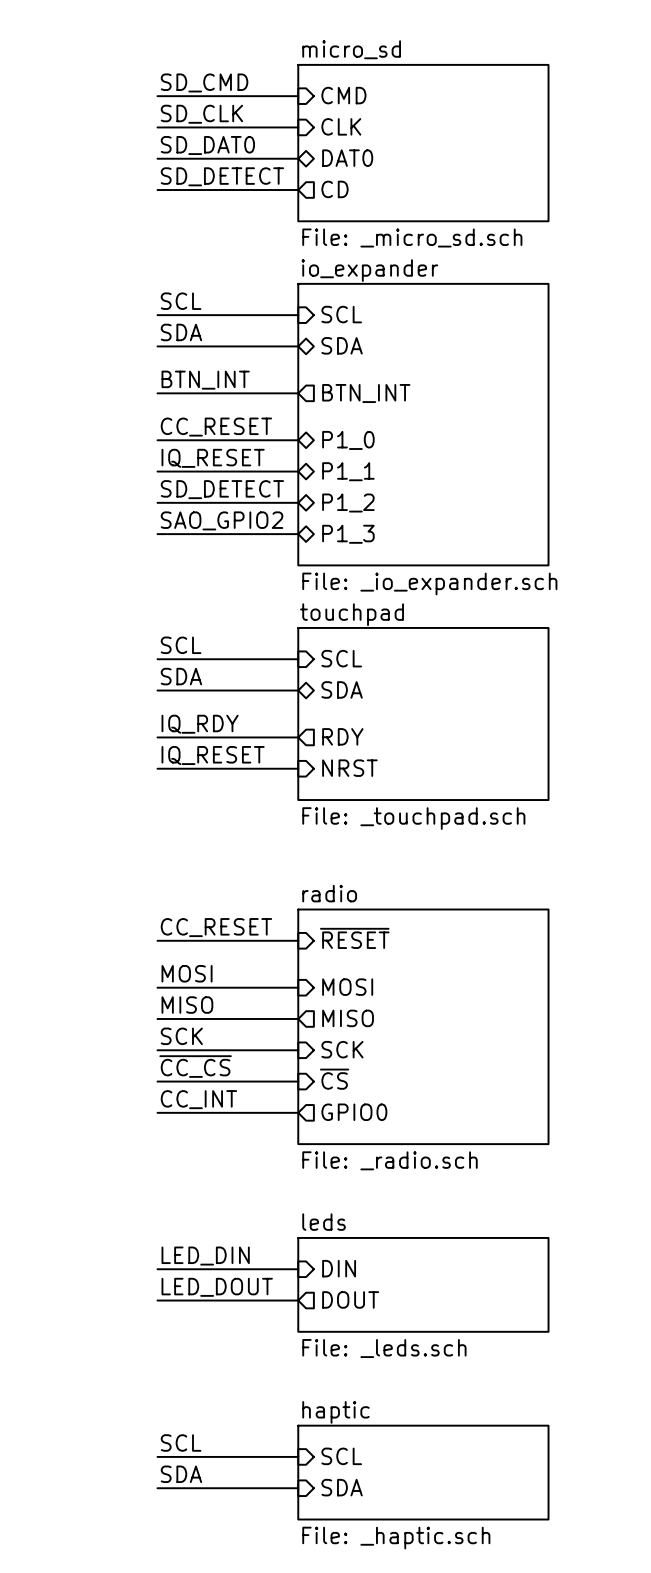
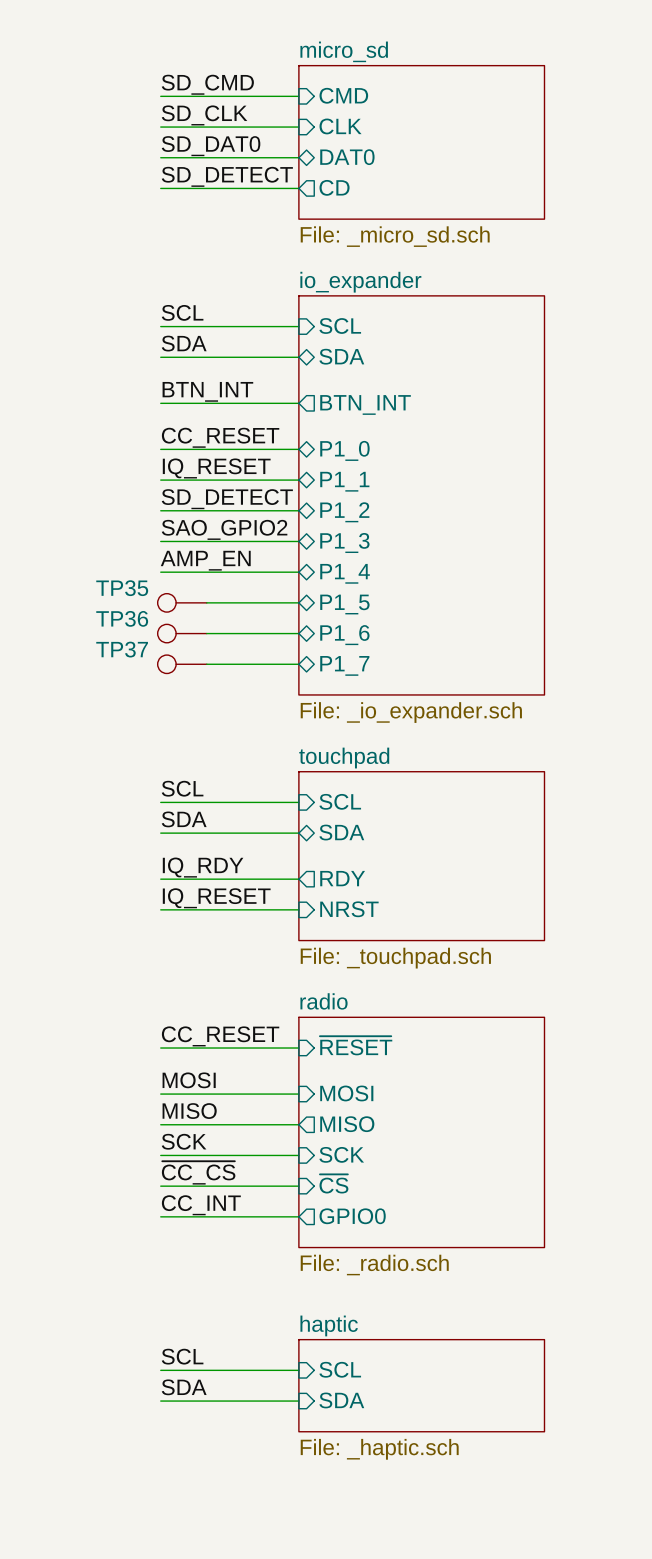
label position: SCL (181, 301) -> SCL (182, 312)
sheet pin position: SCL (341, 314) -> SCL (340, 326)
wire: (157, 315) (298, 315) -> (160, 326) (298, 326)
label position: SDA (181, 332) -> SDA (184, 343)
sheet pin position: SDA (342, 345) -> SDA (341, 356)
wire: (157, 346) (298, 346) -> (160, 357) (298, 357)
label position: BTN_INT (205, 380) -> BTN_INT (207, 391)
wire: (157, 393) (298, 393) -> (160, 510) (298, 510)
sheet pin position: BTN_INT (366, 393) -> BTN_INT (365, 404)
sheet io_expander: File: _io_expander.sch (423, 424) -> none
label position: CC_RESET (216, 427) -> CC_RESET (220, 437)
wire: (157, 440) (298, 440) -> (160, 449) (298, 449)
sheet pin position: P1_0 (348, 440) -> P1_0 (344, 450)
label position: IQ_RESET (213, 458) -> IQ_RESET (216, 468)
wire: (157, 471) (298, 471) -> (160, 480) (298, 480)
sheet pin position: P1_1 (348, 471) -> P1_1 (344, 481)
label position: SD_DETECT (222, 489) -> SD_DETECT (227, 499)
wire: (157, 502) (298, 502) -> (160, 403) (298, 403)
sheet pin position: P1_2 (348, 502) -> P1_2 (344, 512)
sheet io_expander: none -> File: _io_expander.sch (421, 495)
label position: SAO_GPIO2 (222, 520) -> SAO_GPIO2 (224, 529)
wire: (157, 534) (298, 534) -> (160, 541) (298, 541)
sheet pin position: P1_3 (348, 534) -> P1_3 (344, 543)
label: none -> AMP_EN (205, 560)
sheet pin: none -> P1_4 (345, 573)
TP35: none -> (182, 602)
wire: none -> (206, 602) (298, 602)
sheet pin: none -> P1_5 (344, 604)
TP36: none -> (182, 633)
wire: none -> (206, 633) (298, 633)
sheet pin: none -> P1_6 (344, 635)
label position: SCL (181, 645) -> SCL (182, 788)
sheet pin position: SCL (341, 658) -> SCL (340, 801)
wire: (157, 659) (298, 659) -> (160, 833) (298, 833)
TP37: none -> (182, 664)
wire: none -> (206, 664) (298, 664)
sheet pin: none -> P1_7 (344, 665)
label position: SDA (181, 676) -> SDA (184, 819)
sheet pin position: SDA (342, 689) -> SDA (341, 832)
wire: (157, 690) (298, 690) -> (160, 802) (298, 802)
sheet touchpad position: (423, 713) -> (421, 856)
label position: IQ_RDY (200, 724) -> IQ_RDY (203, 867)
sheet pin position: RDY (342, 736) -> RDY (342, 878)
wire: (157, 737) (298, 737) -> (160, 572) (298, 572)
label: IQ_RESET (213, 755) -> none
wire: (157, 768) (298, 768) -> (160, 879) (298, 879)
sheet pin position: NRST (349, 768) -> NRST (349, 909)
label: none -> IQ_RESET (216, 898)
label position: CC_RESET (216, 927) -> CC_RESET (220, 1036)
sheet pin position: ~{RESET} (354, 938) -> ~{RESET} (356, 1045)
wire: (157, 940) (298, 940) -> (160, 1048) (298, 1048)
label: MOSI (187, 973) -> none
wire: (157, 987) (298, 987) -> (160, 909) (298, 909)
sheet pin: MOSI (347, 987) -> none
label position: MISO (187, 1005) -> MISO (189, 1111)
wire: (157, 1018) (298, 1018) -> (160, 1124) (298, 1124)
sheet pin position: MISO (348, 1018) -> MISO (347, 1124)
sheet radio position: (423, 1026) -> (421, 1132)
label position: SCK (181, 1036) -> SCK (184, 1141)
sheet pin position: SCK (342, 1049) -> SCK (341, 1154)
wire: (157, 1050) (298, 1050) -> (160, 1155) (298, 1155)
label position: ~{CC_CS} (195, 1066) -> ~{CC_CS} (198, 1172)
sheet pin position: ~{CS} (334, 1079) -> ~{CS} (333, 1183)
wire: (157, 1081) (298, 1081) -> (160, 1186) (298, 1186)
label: CC_INT (198, 1099) -> MOSI (189, 1080)
sheet pin shape: output (354, 1112) -> input (346, 1093)
sheet pin: GPIO0 (354, 1112) -> MOSI (346, 1093)
label: none -> CC_INT (201, 1205)
sheet pin: none -> GPIO0 (352, 1216)
label: LED_DIN (205, 1256) -> none
sheet pin: DIN (339, 1268) -> none
wire: (157, 1269) (298, 1269) -> (160, 1370) (298, 1370)
sheet leds: File: _leds.sch (423, 1284) -> none
label: LED_DOUT (217, 1287) -> none
sheet pin: DOUT (350, 1299) -> none
wire: (157, 1300) (298, 1300) -> (160, 1401) (298, 1401)
label position: SCL (181, 1442) -> SCL (182, 1356)
wire: (157, 1456) (298, 1456) -> none
sheet pin position: SCL (341, 1456) -> SCL (340, 1369)
sheet haptic position: (423, 1472) -> (421, 1385)
label position: SDA (181, 1474) -> SDA (184, 1387)
sheet pin position: SDA (342, 1487) -> SDA (341, 1400)
wire: (157, 1488) (298, 1488) -> (160, 1216) (298, 1216)

